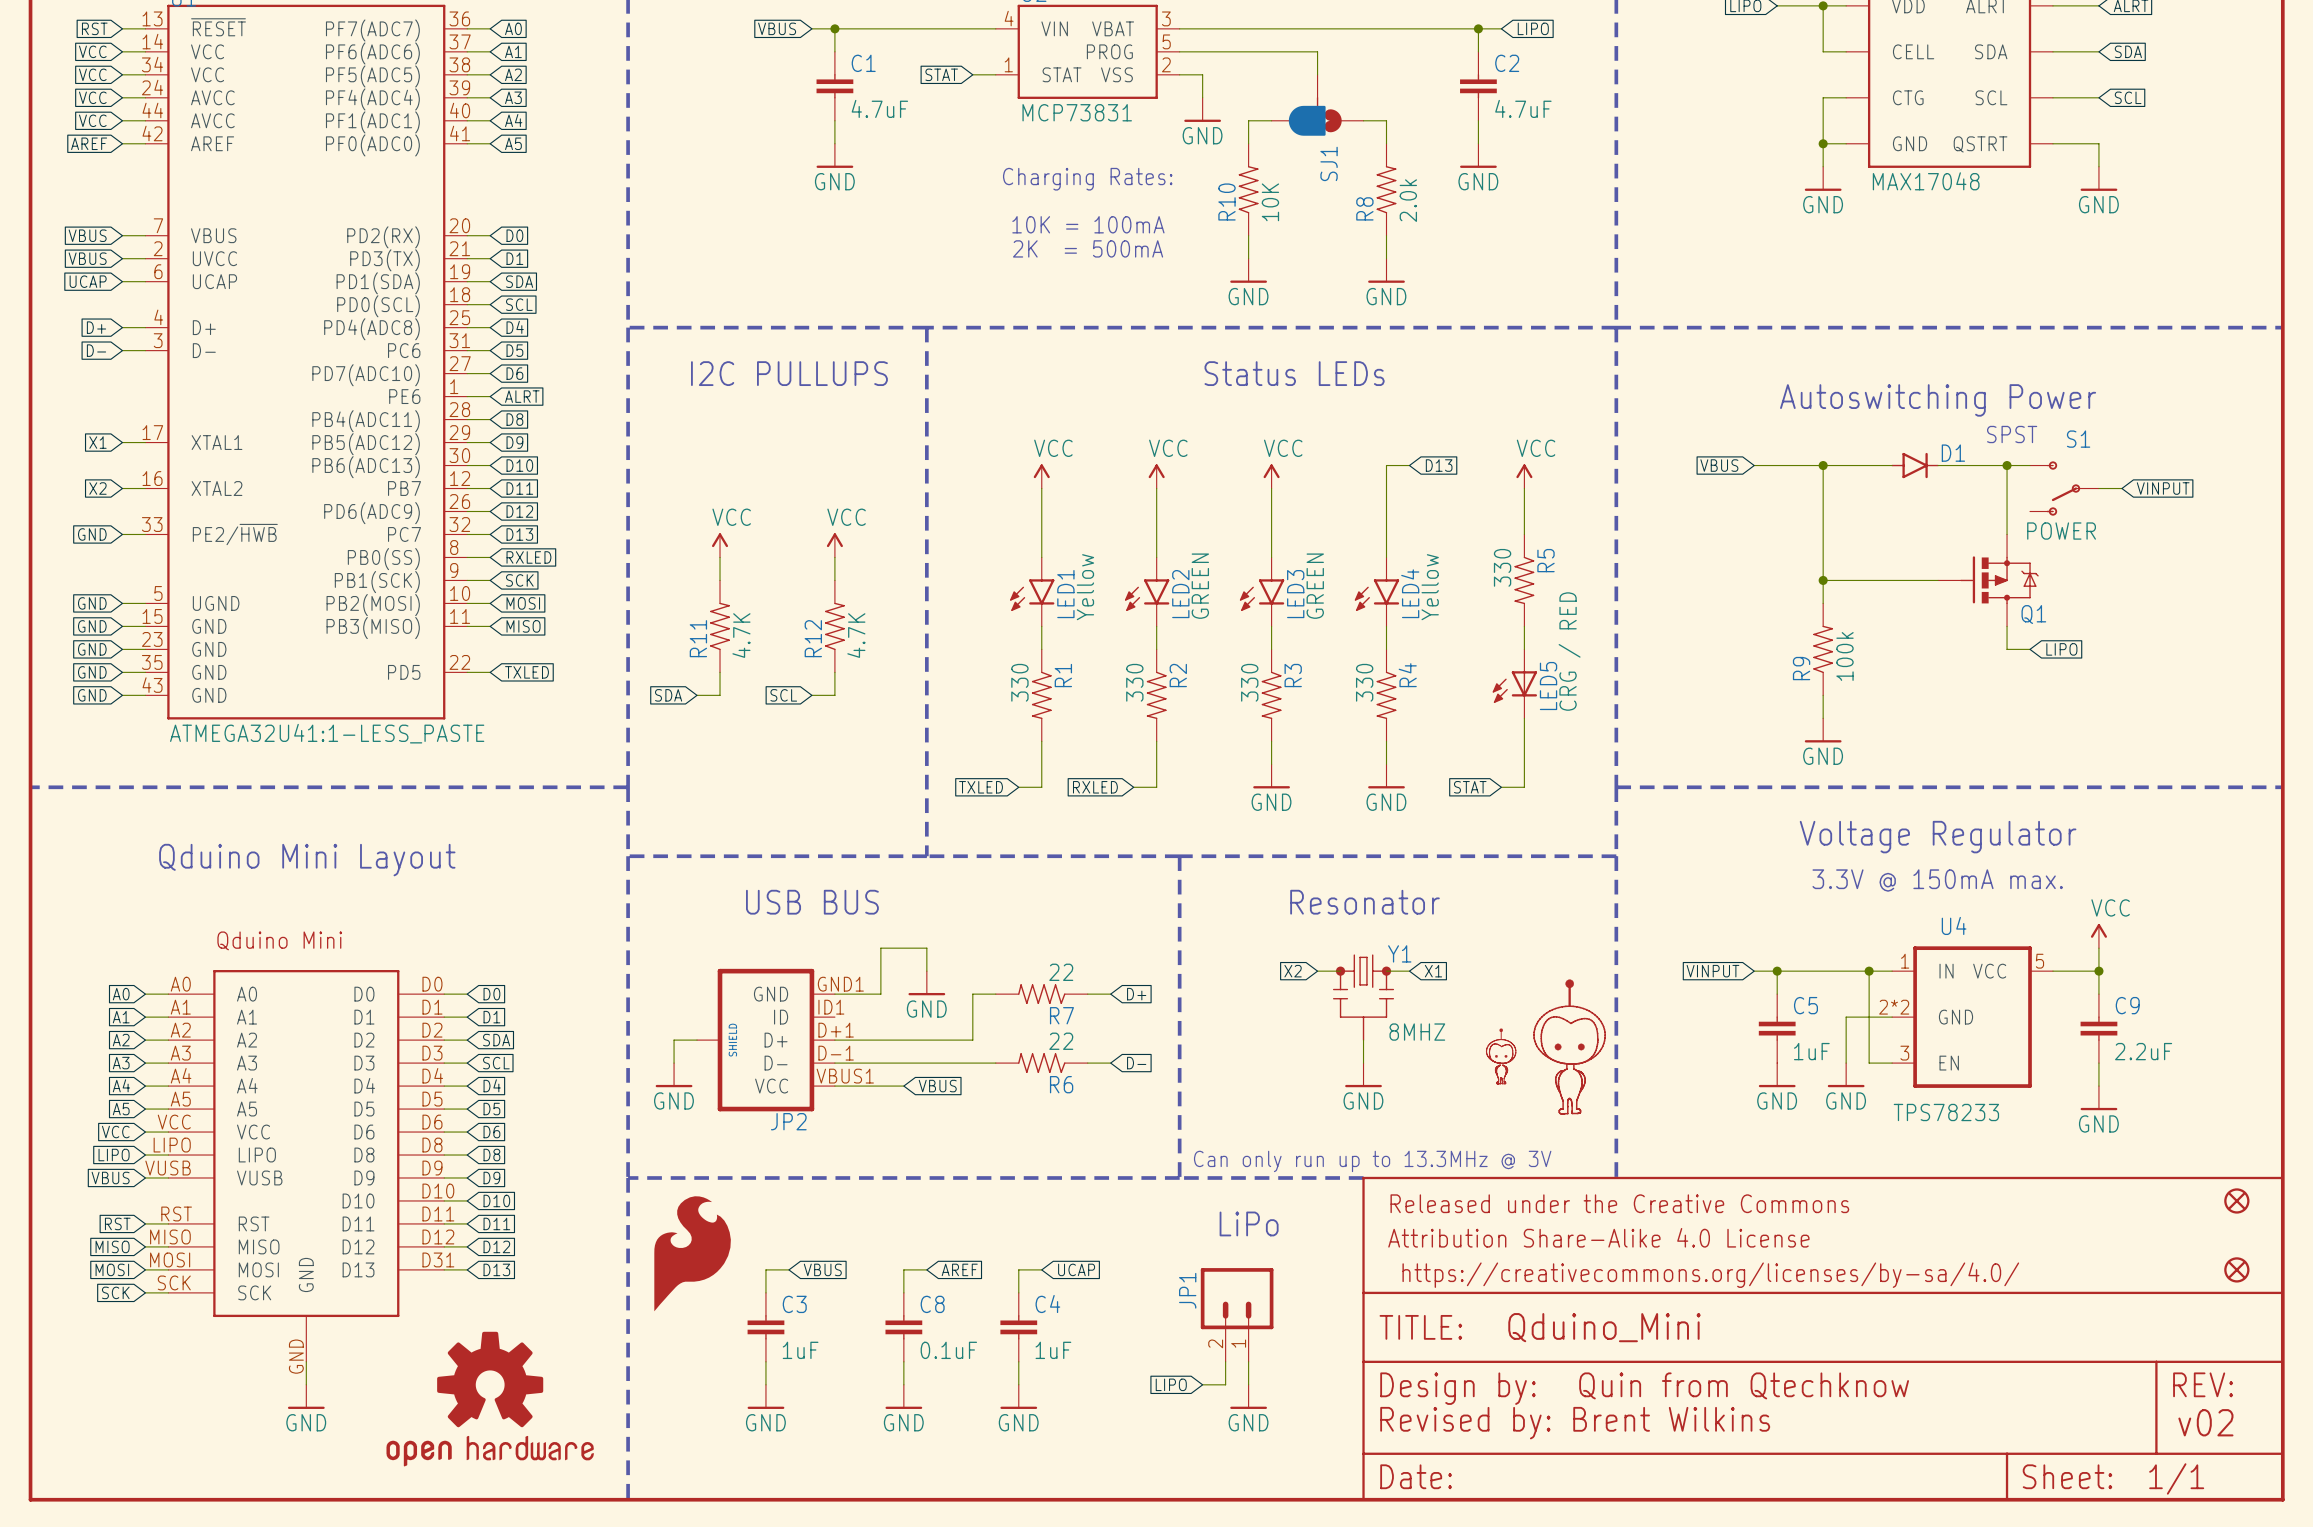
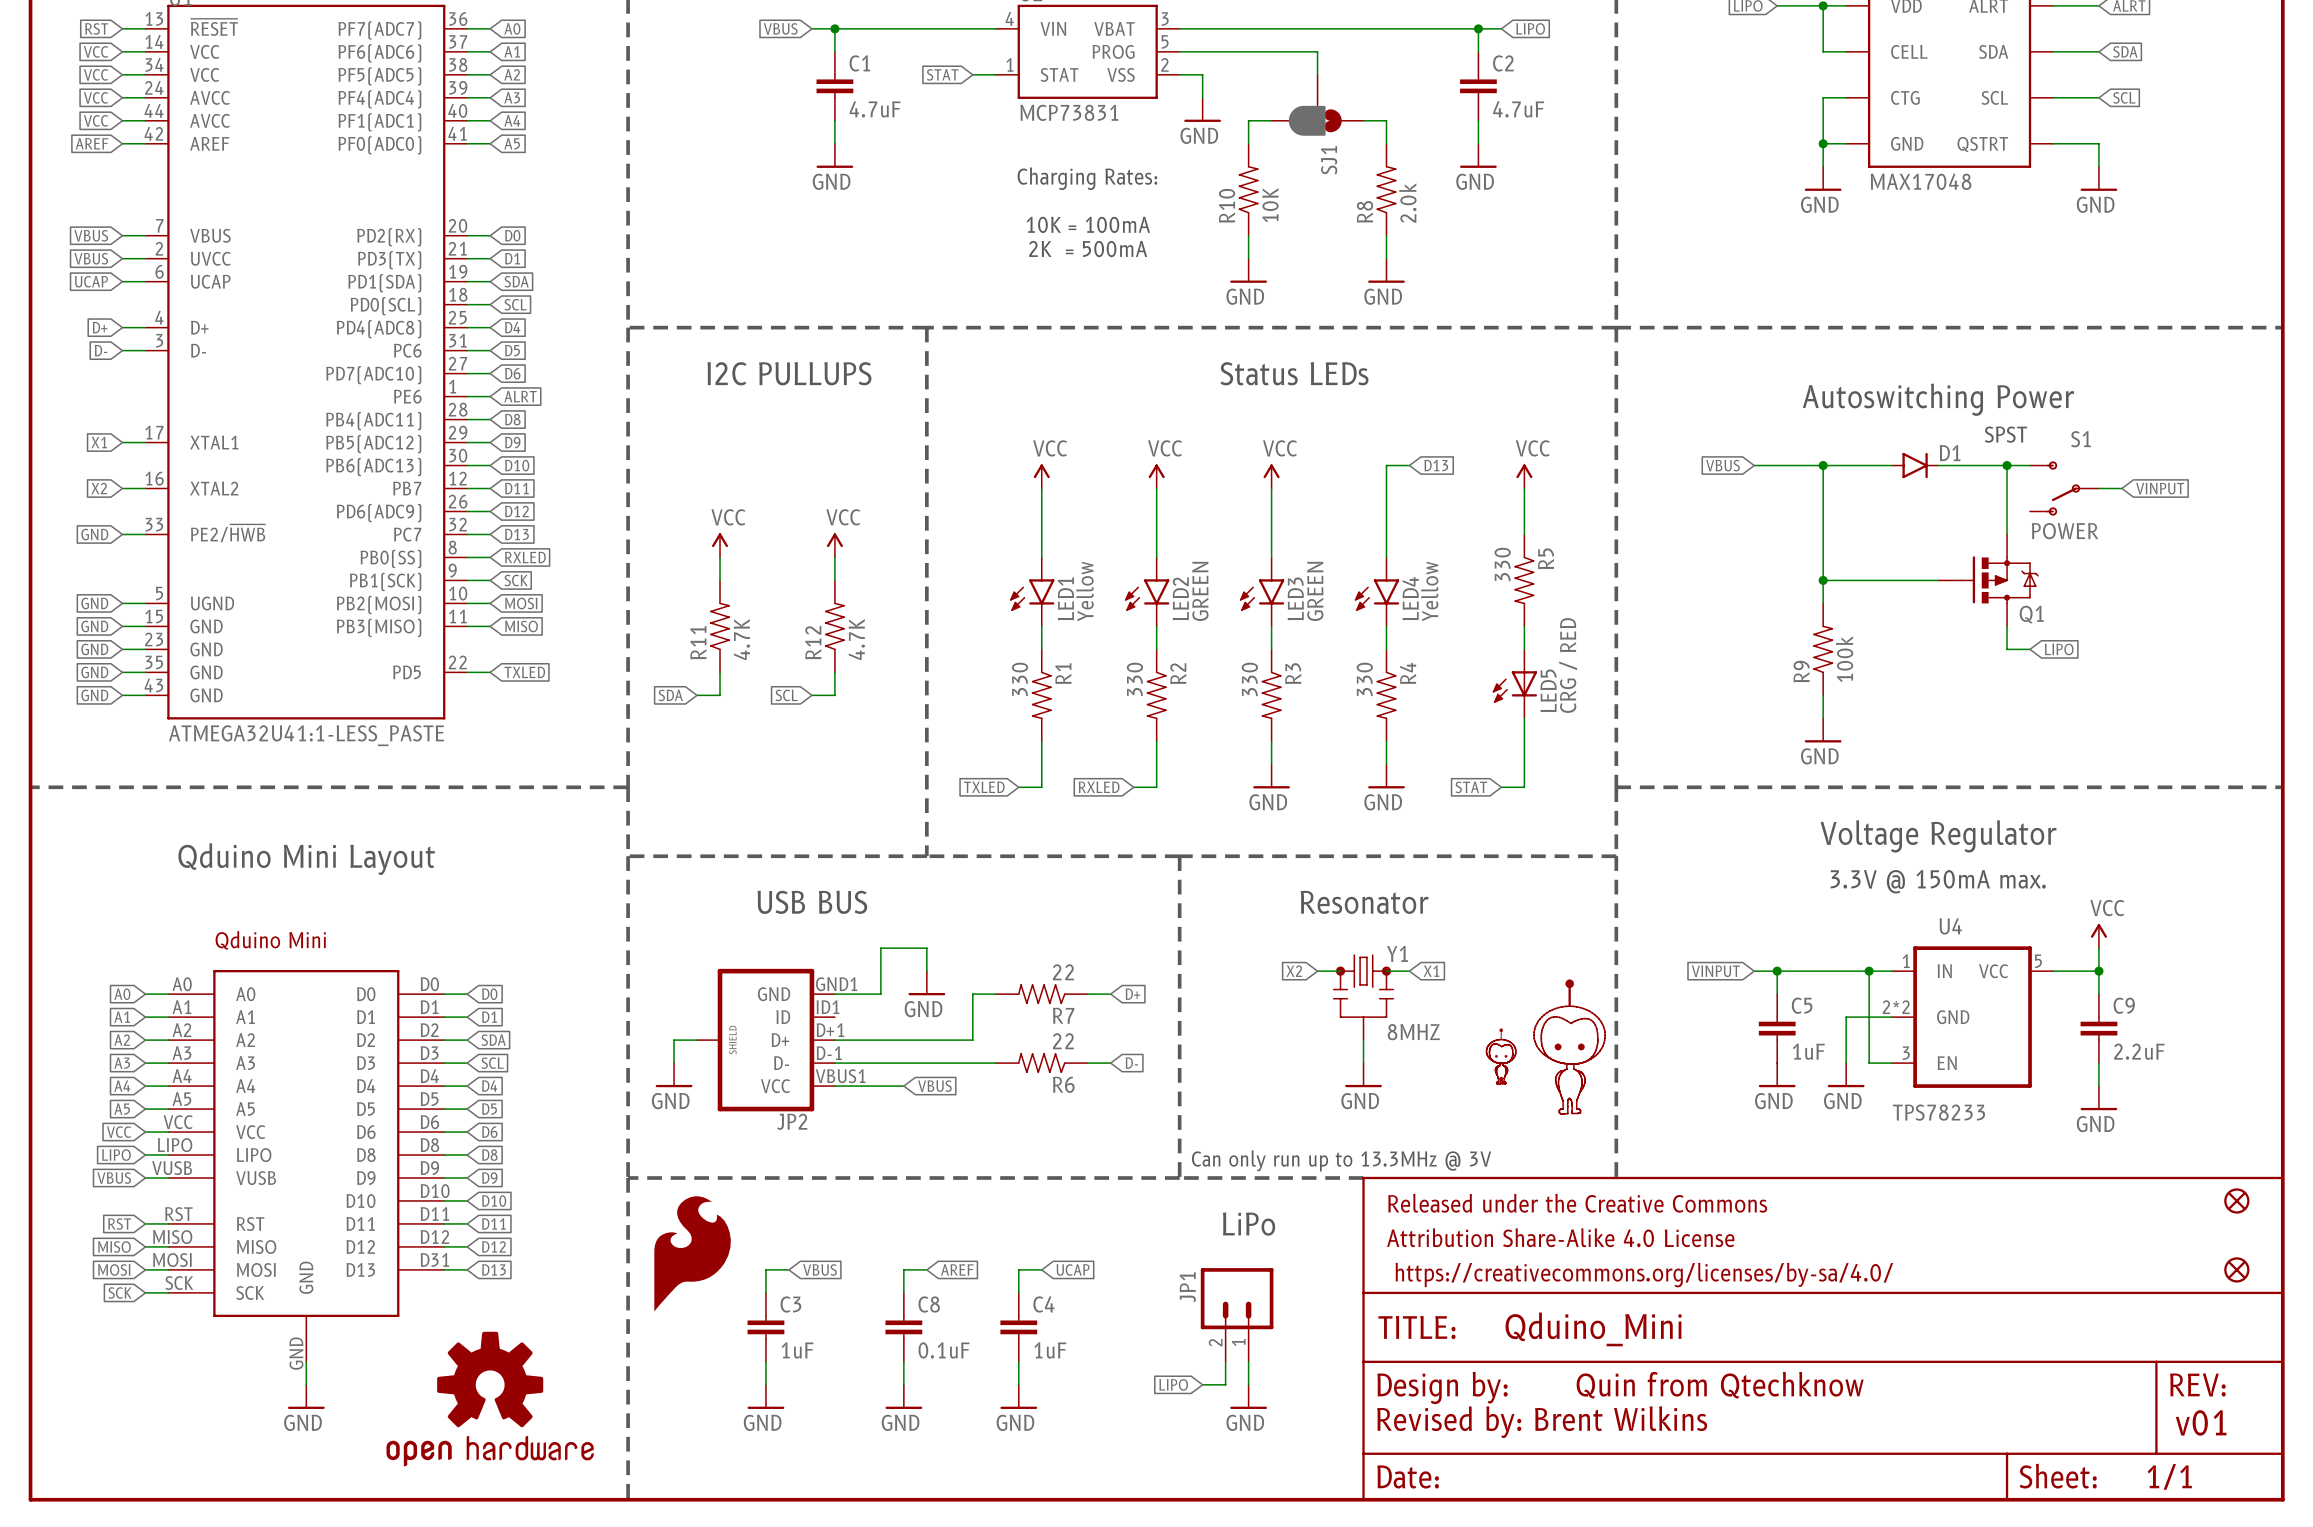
text: v02 (2205, 1422) -> v01 (2201, 1422)

